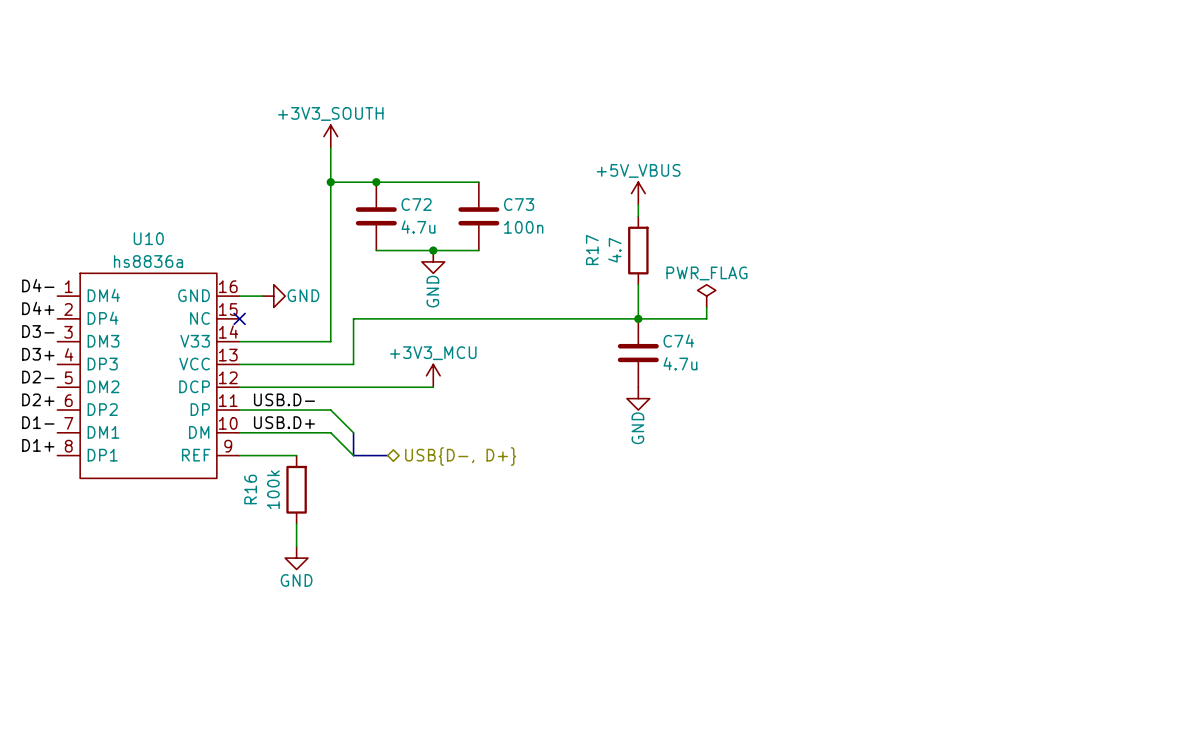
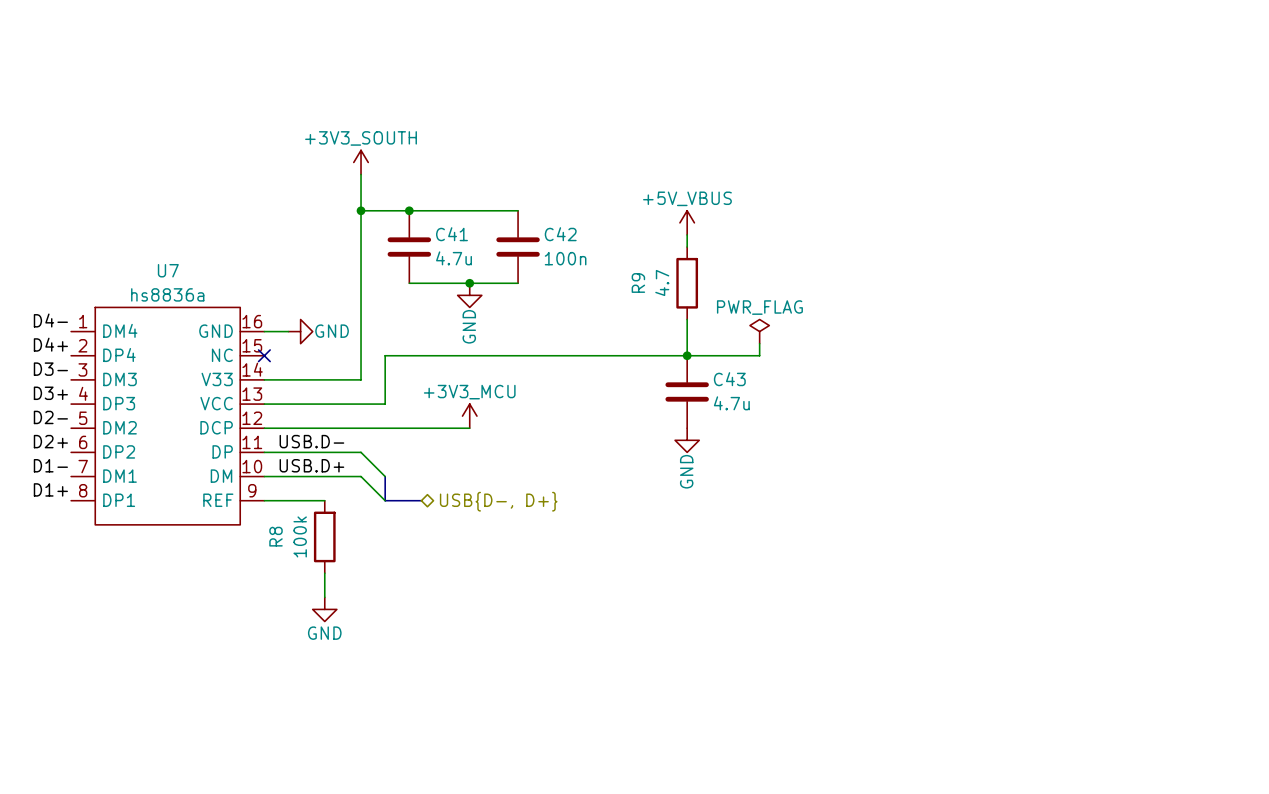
C72 name: C72 (416, 204) -> C41 (451, 234)
C73 name: C73 (519, 204) -> C42 (560, 234)
U10 name: U10 (148, 238) -> U7 (168, 270)
R17 name: R17 (592, 250) -> R9 (638, 282)
C74 name: C74 (678, 340) -> C43 (729, 379)
R16 name: R16 (250, 489) -> R8 (276, 536)

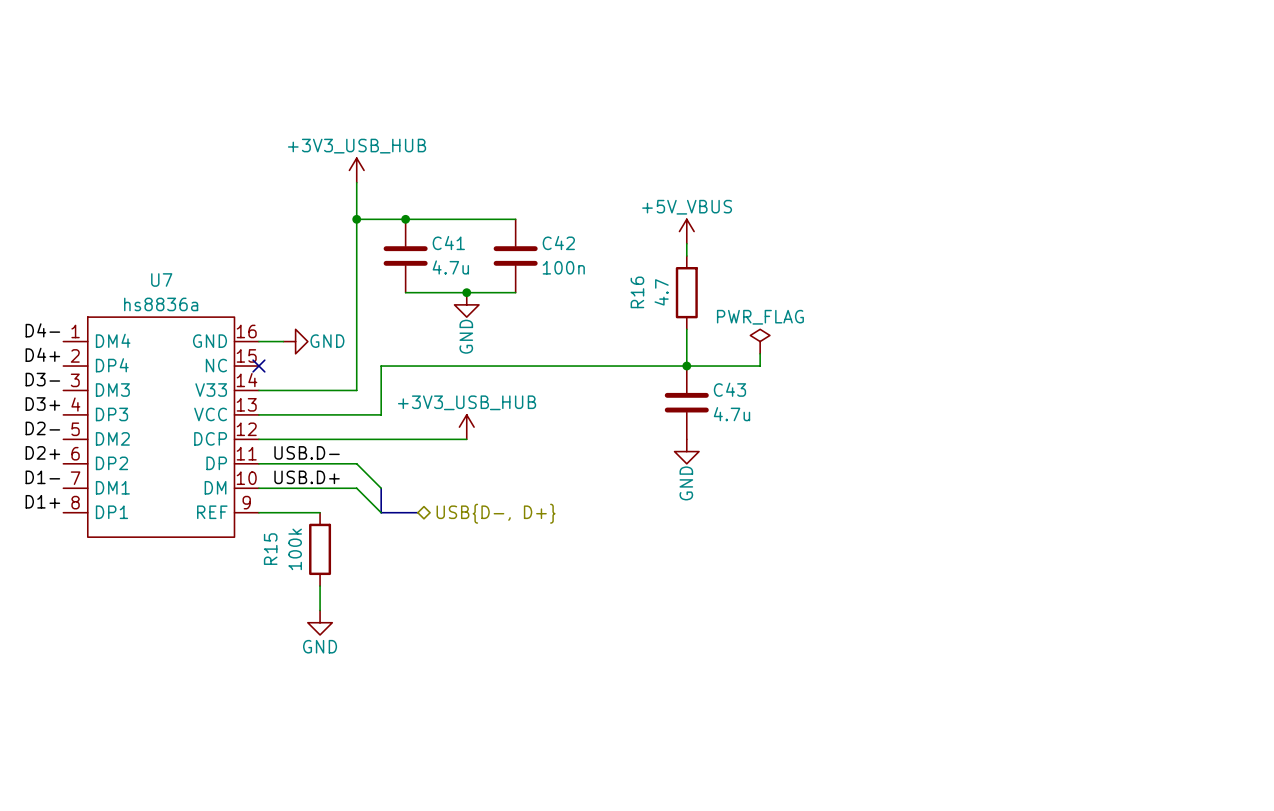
power symbol: +3V3_SOUTH (361, 162) -> +3V3_USB_HUB (356, 170)
R9 name: R9 (638, 282) -> R16 (637, 292)
power symbol: +3V3_MCU (469, 416) -> +3V3_USB_HUB (466, 427)
R8 name: R8 (276, 536) -> R15 (270, 549)

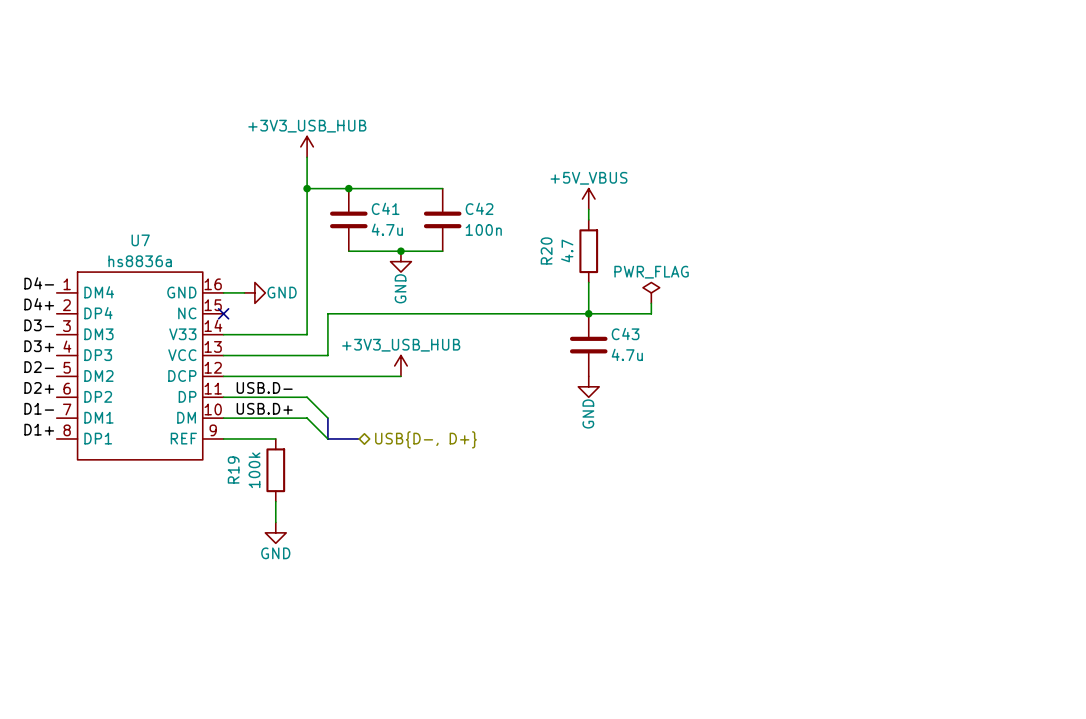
R16 name: R16 (637, 292) -> R20 (546, 250)
R15 name: R15 (270, 549) -> R19 (233, 470)

